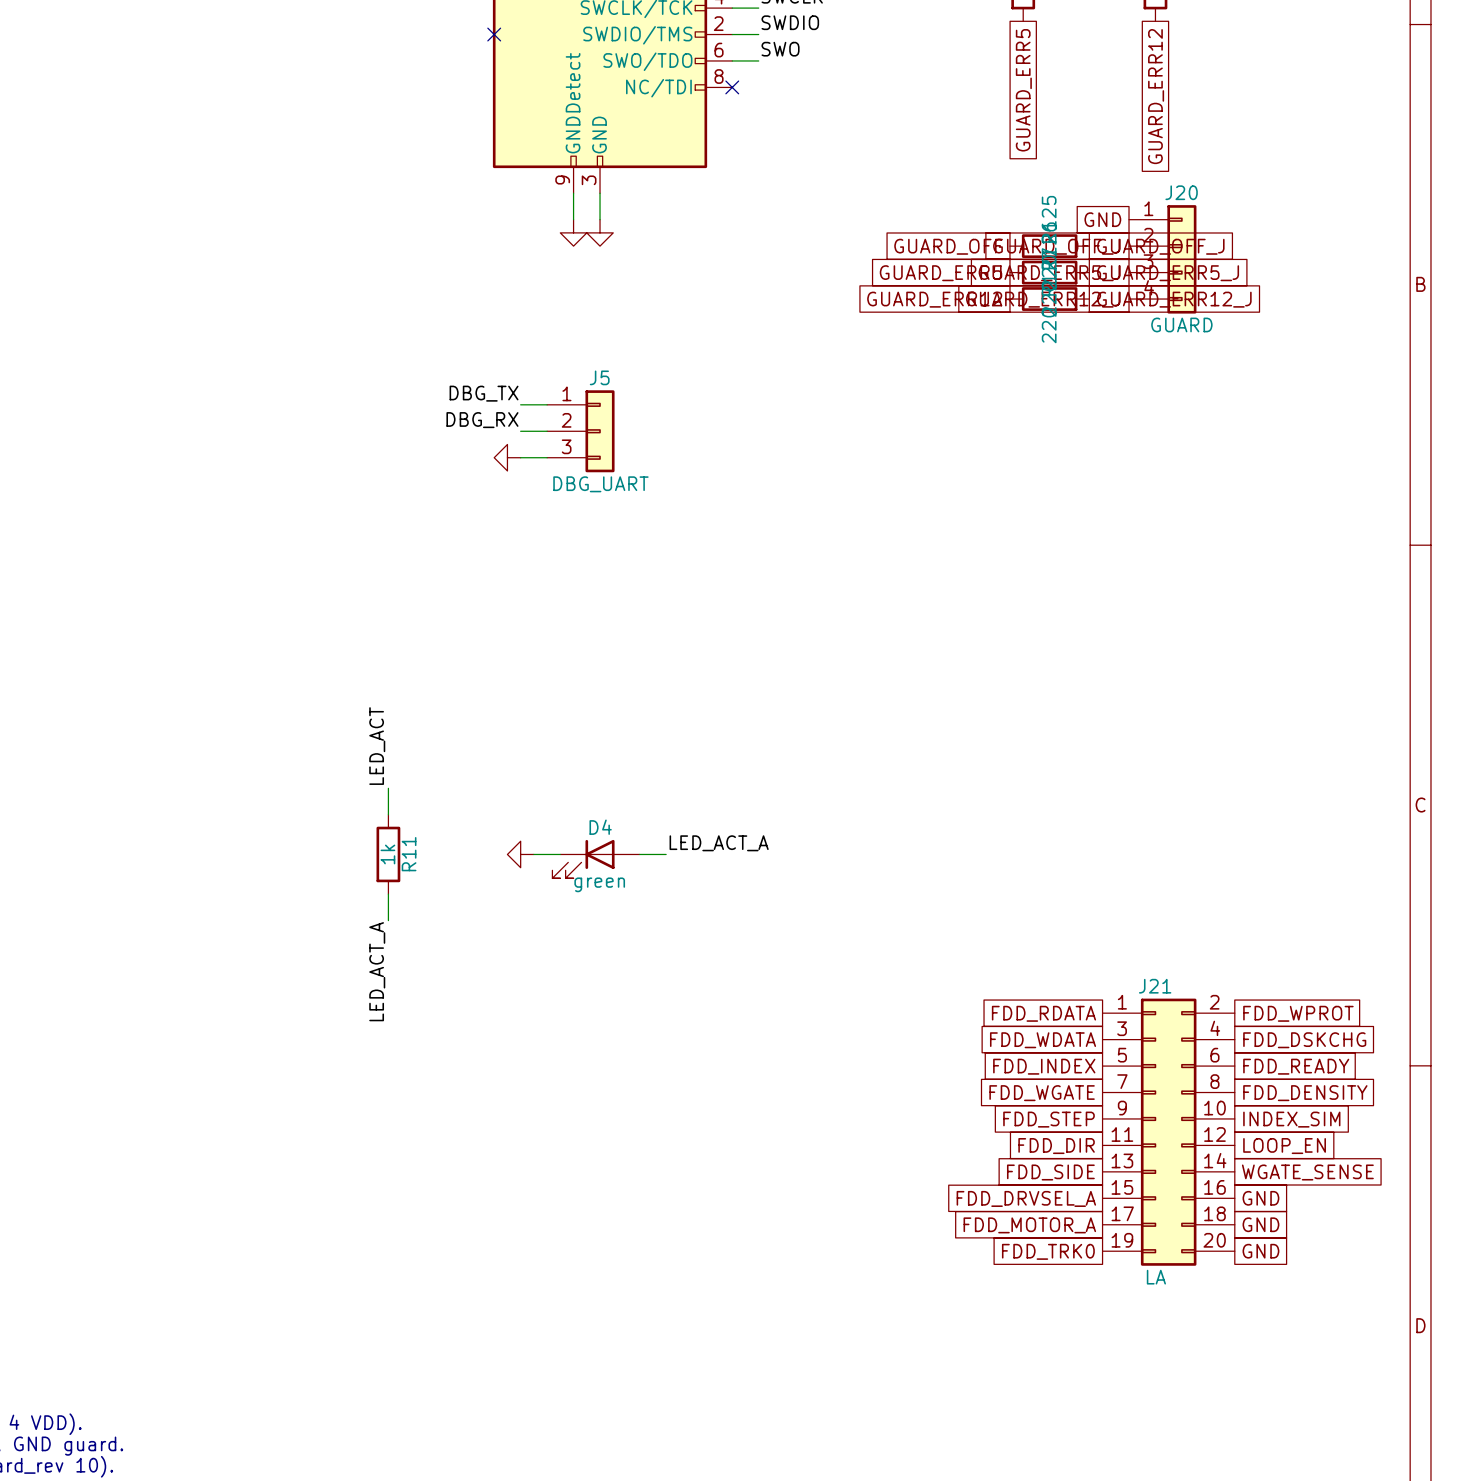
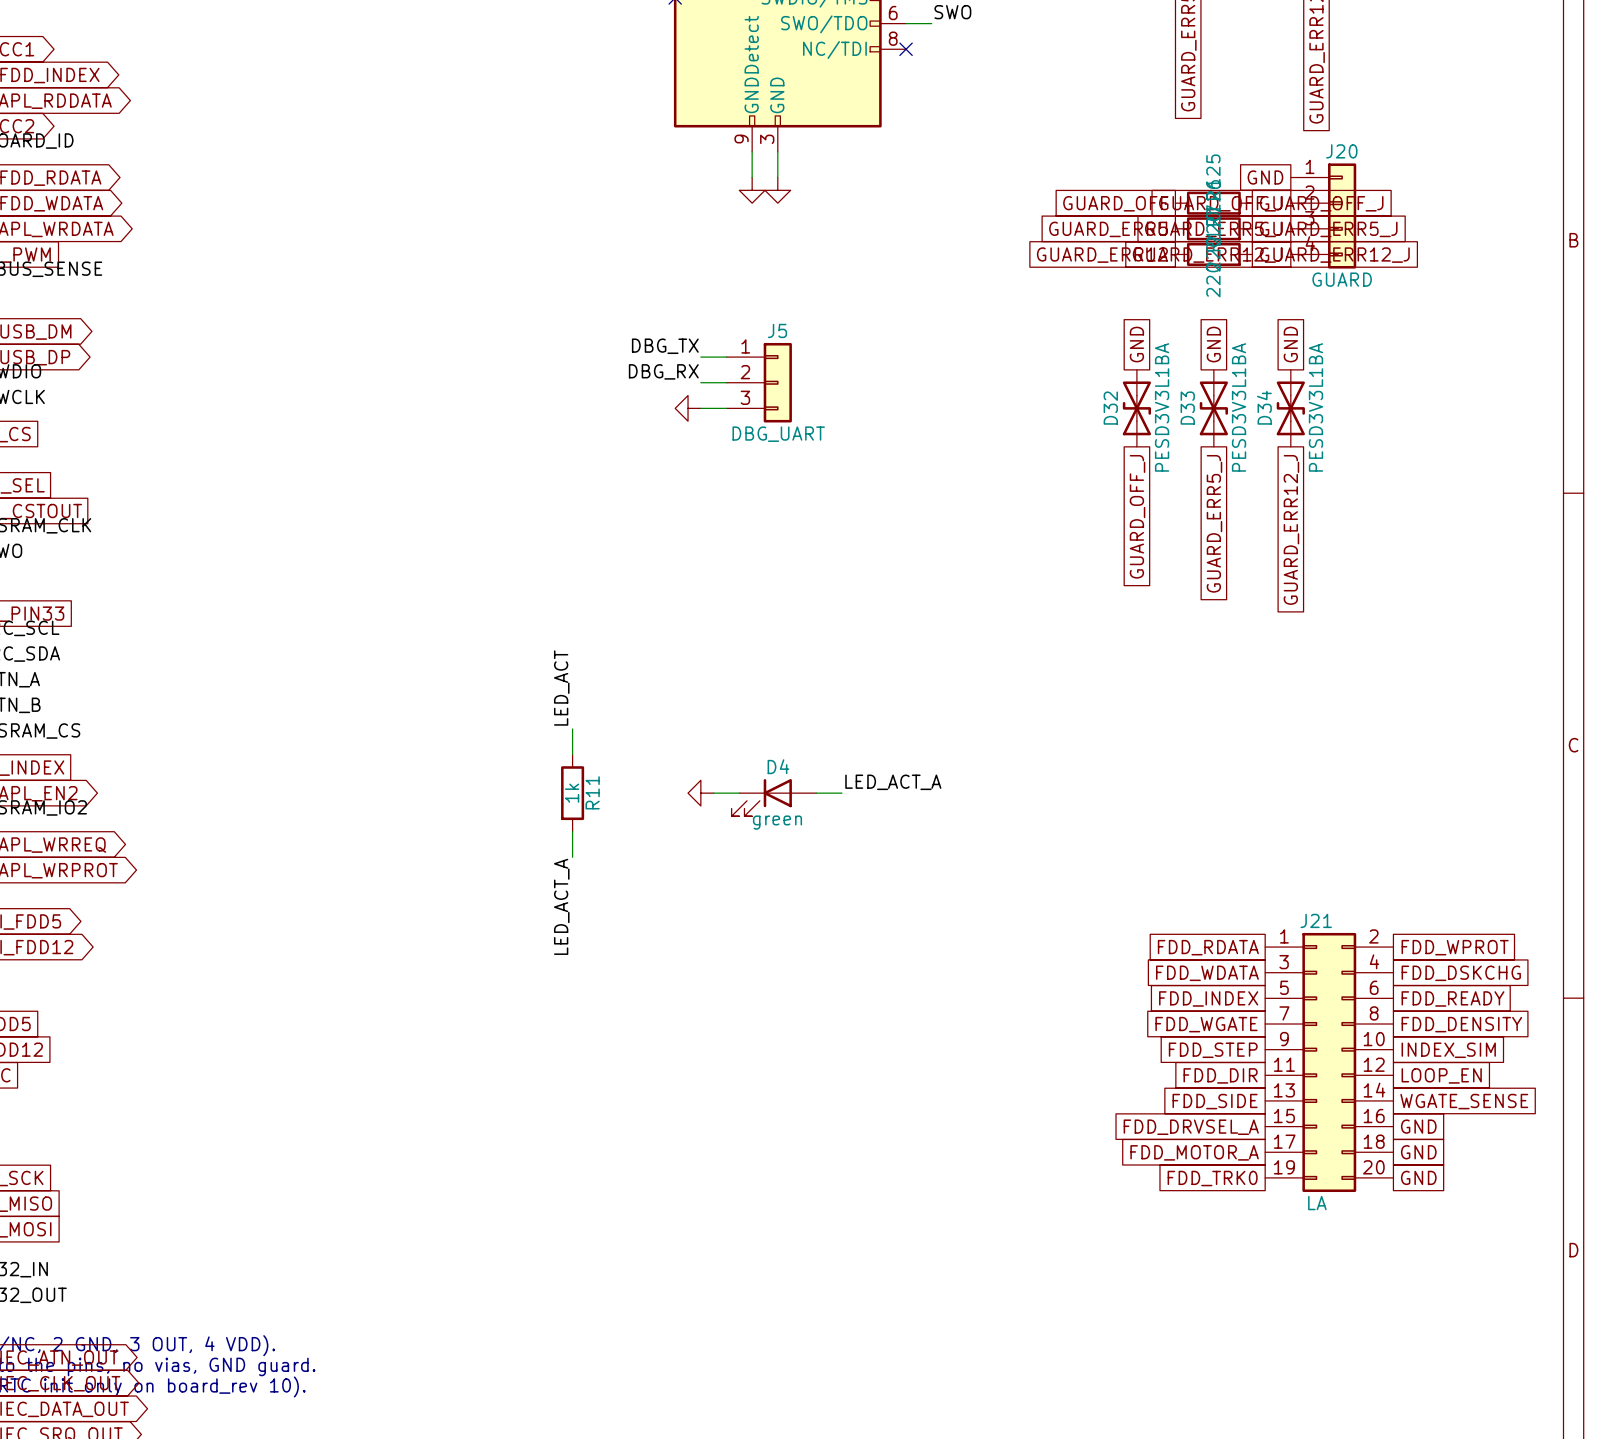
global label: none -> GND (1136, 344)
global label: none -> GND (1213, 344)
global label: none -> GND (1290, 344)
D32: none -> PESD3V3L1BA (1136, 408)
D33: none -> PESD3V3L1BA (1213, 408)
D34: none -> PESD3V3L1BA (1290, 408)
global label: none -> GUARD_OFF_J (1137, 516)
global label: none -> GUARD_ERR5_J (1214, 523)
global label: none -> GUARD_ERR12_J (1291, 529)

